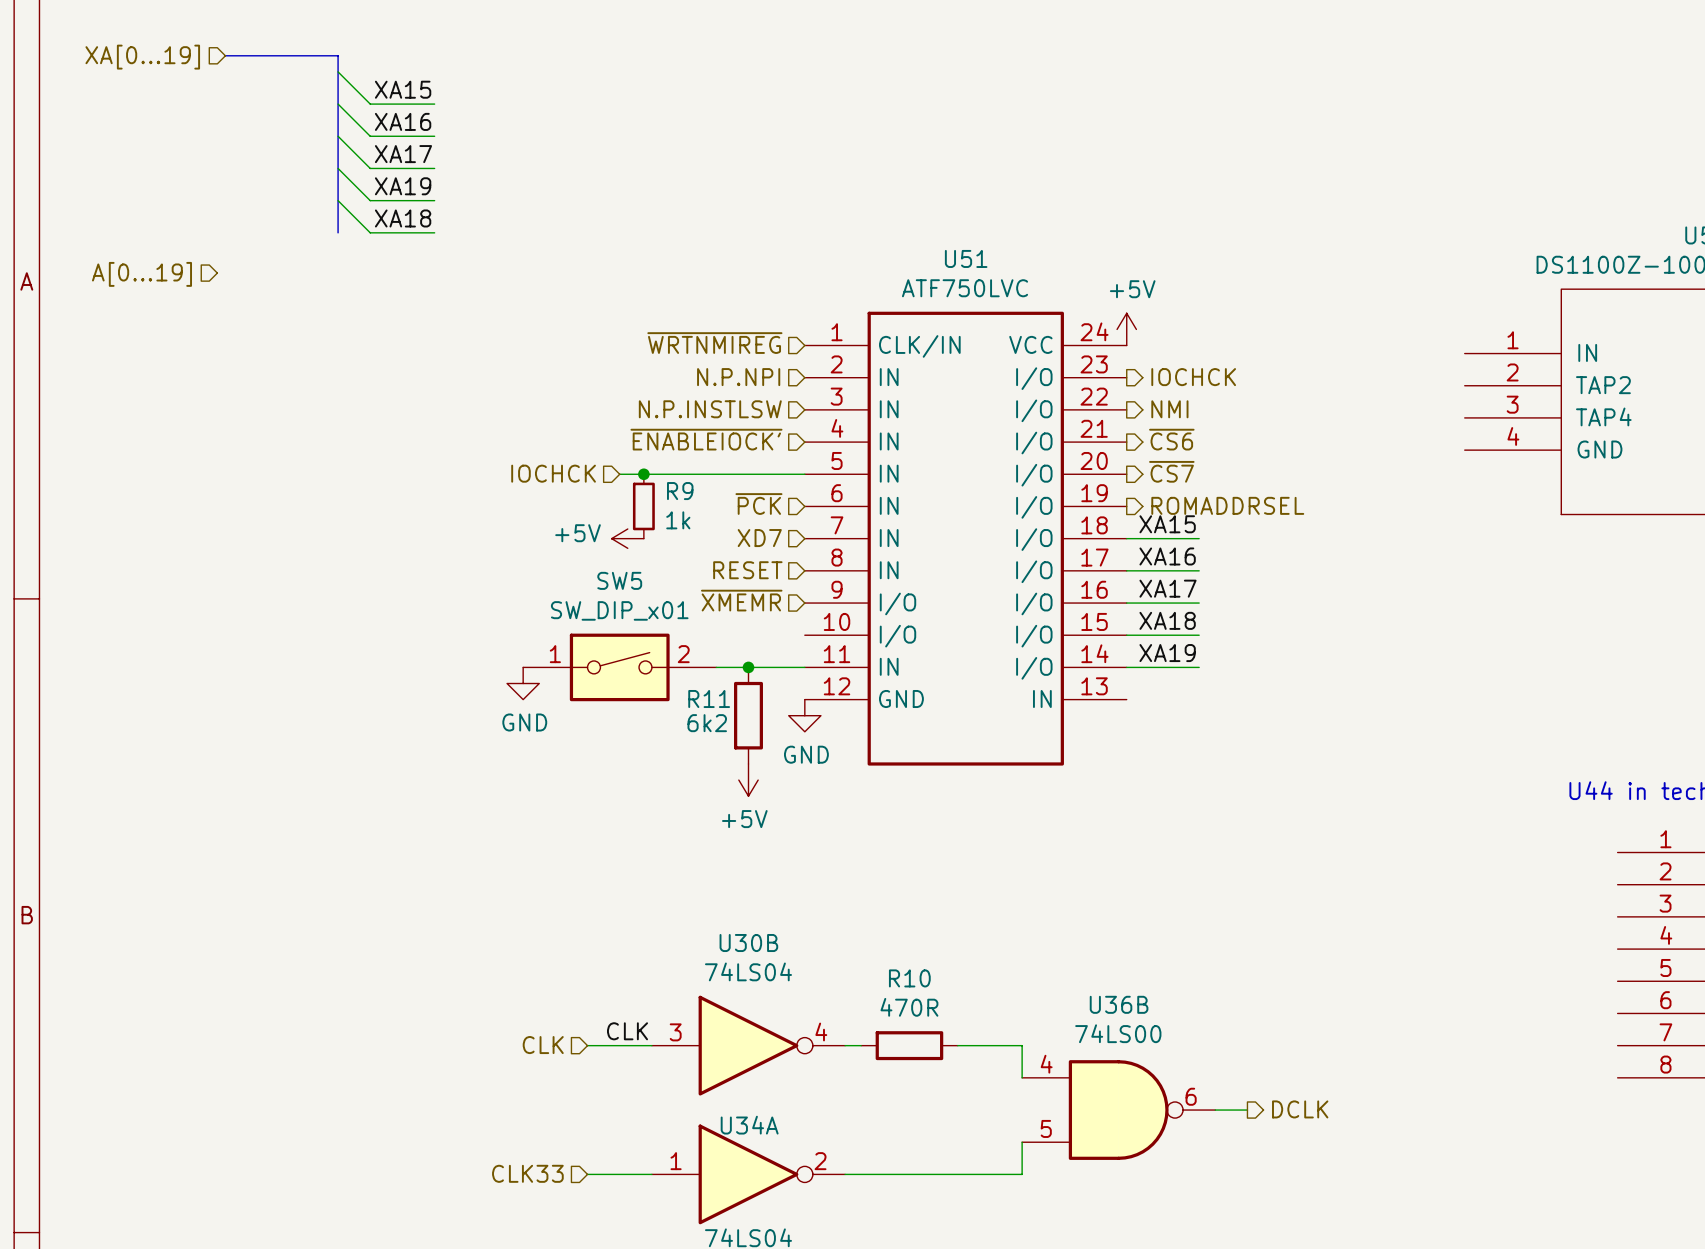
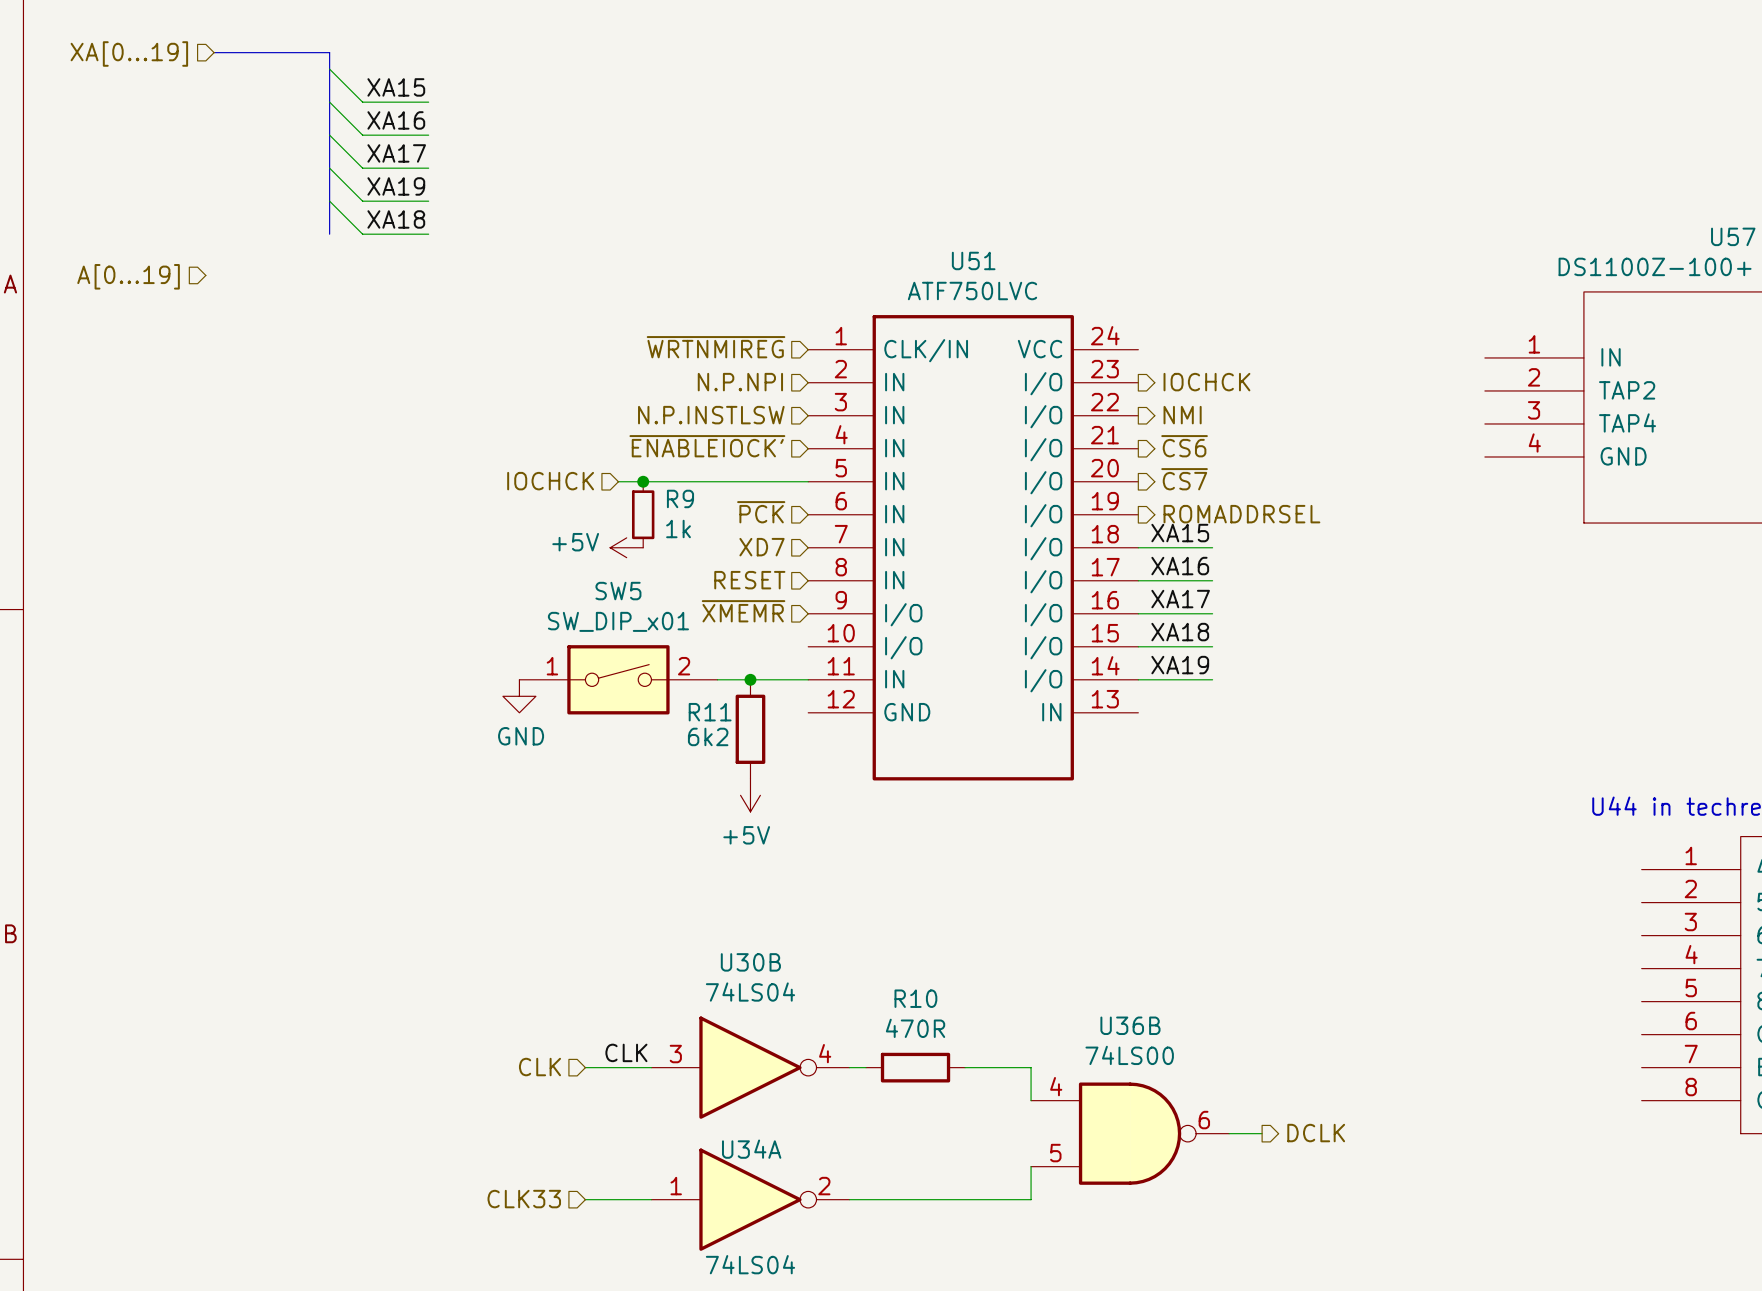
power symbol: +5V (1126, 329) -> none
power symbol: GND (804, 715) -> none

